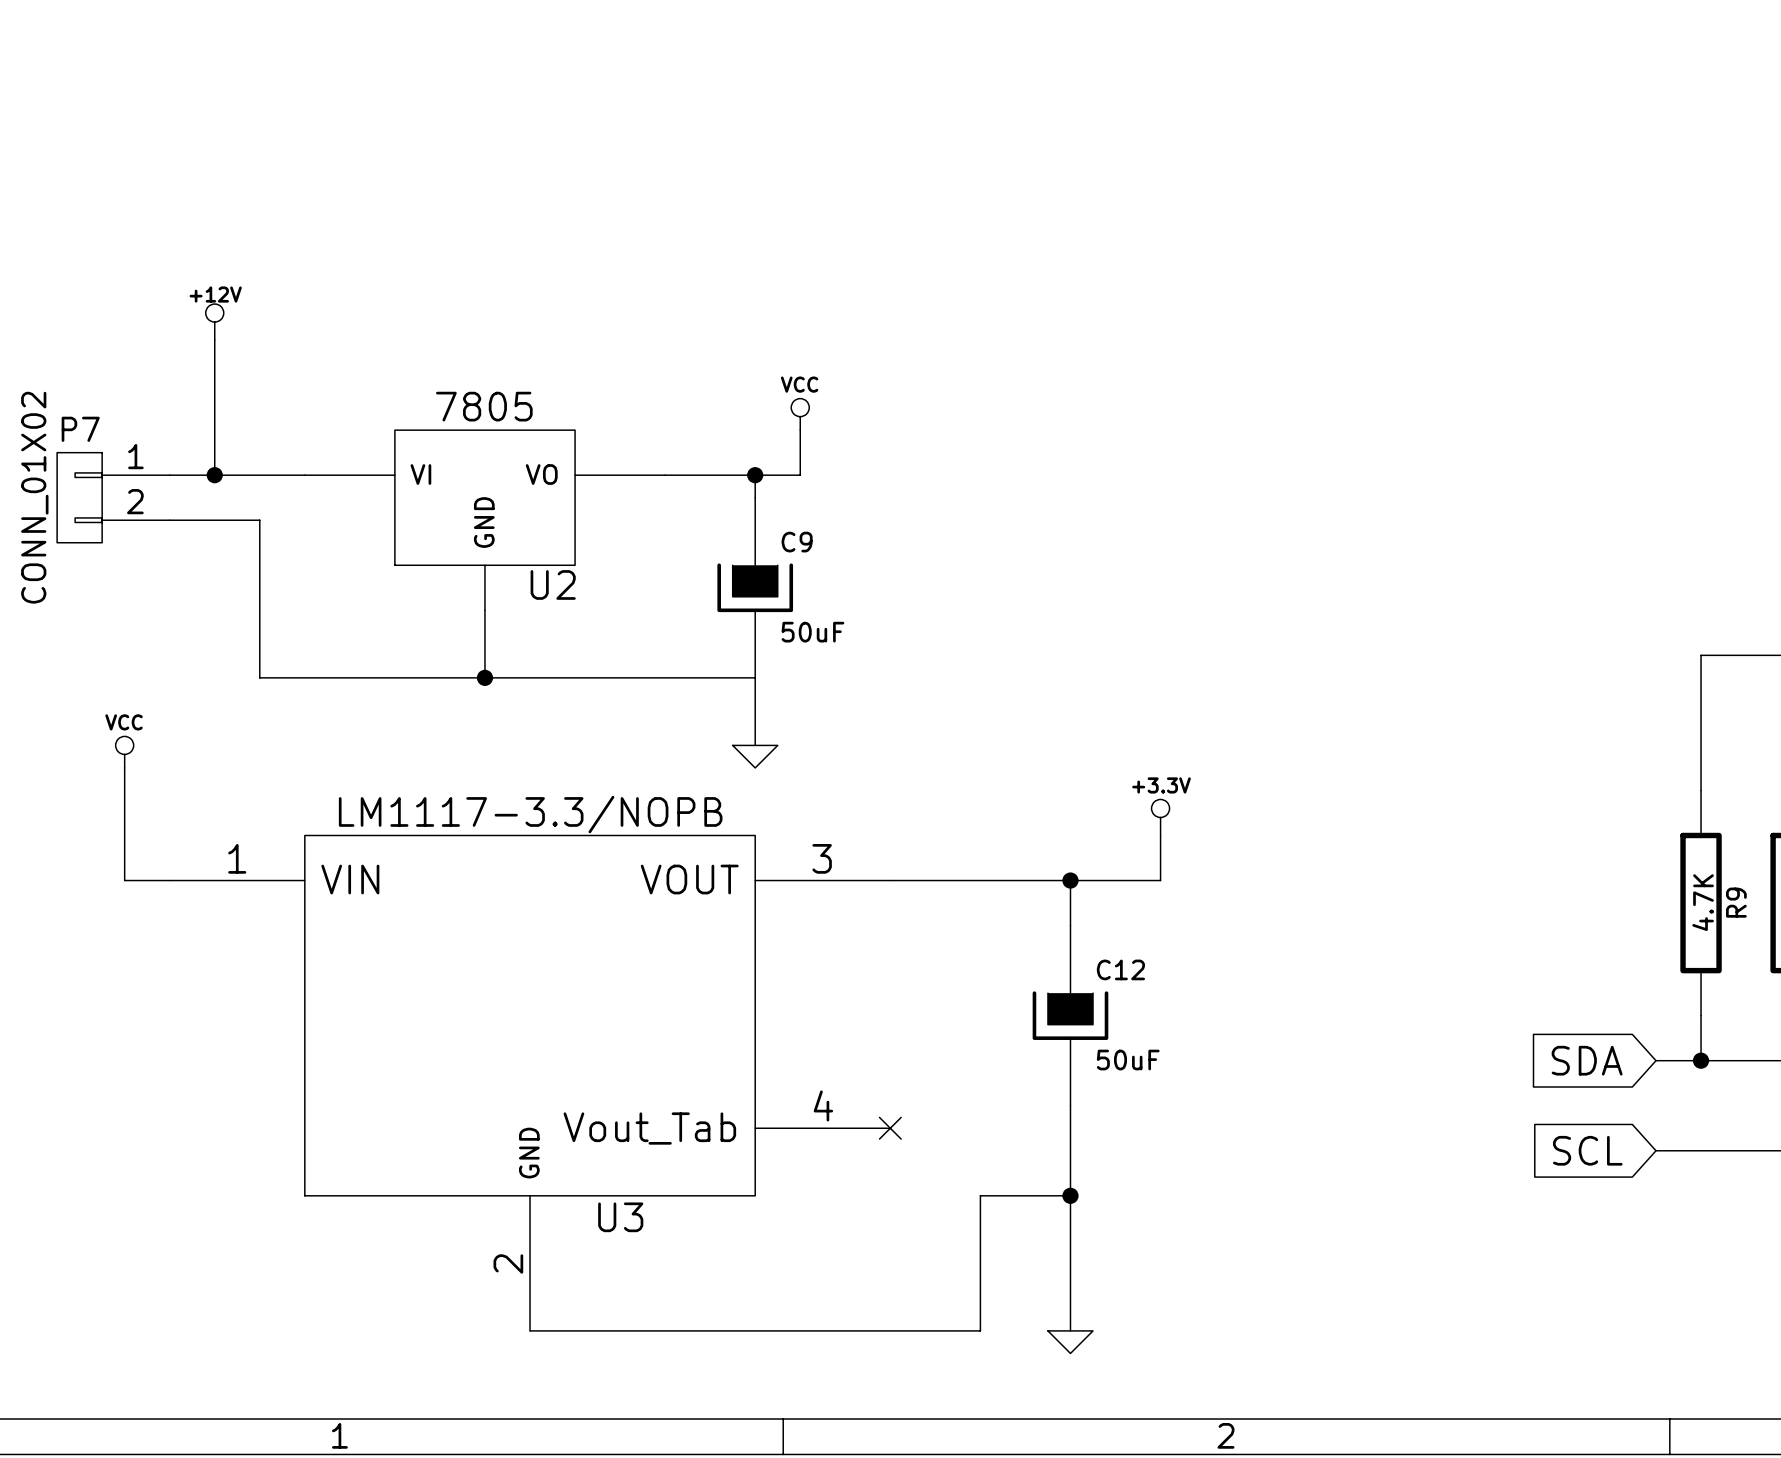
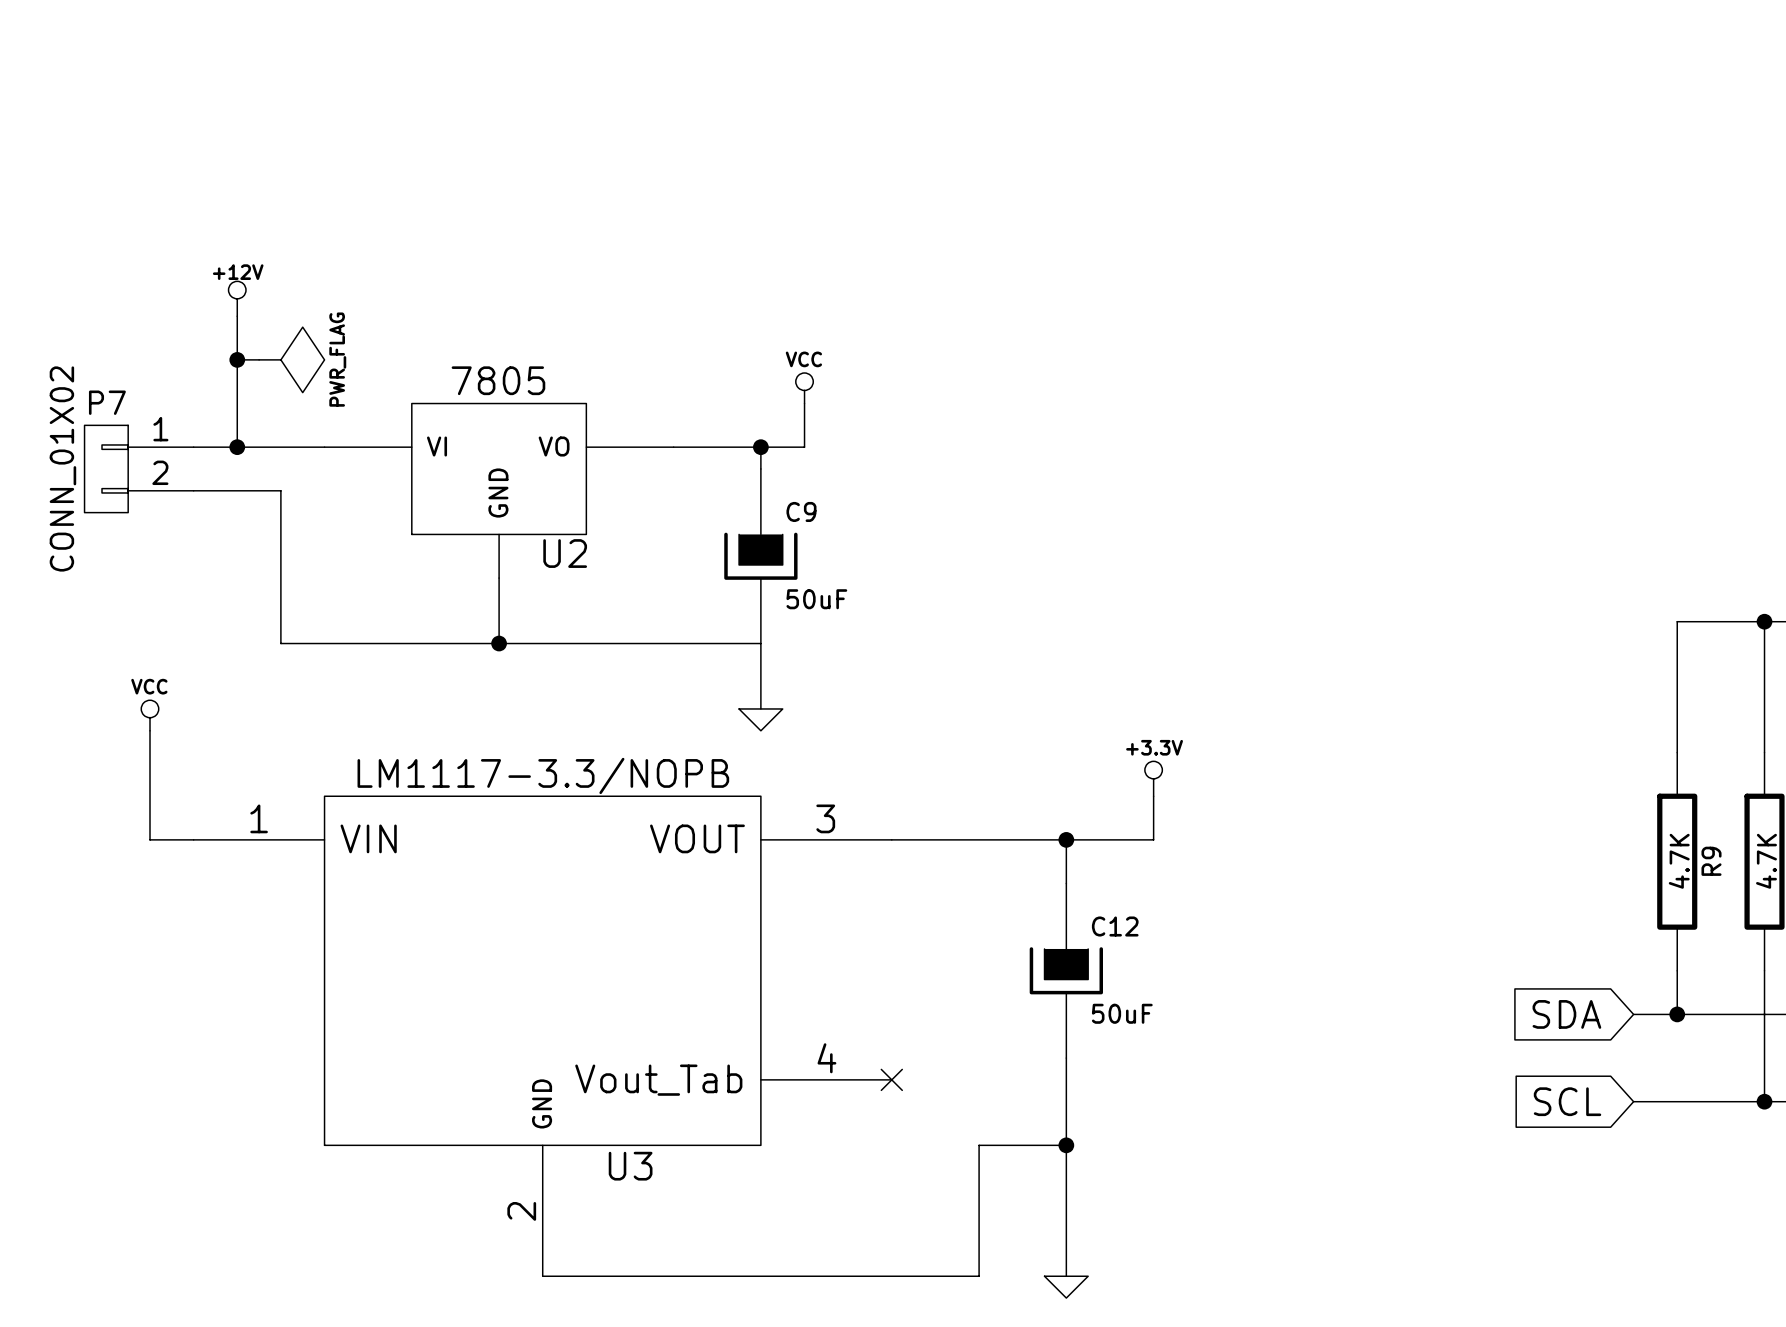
wire: none -> (237, 359) (259, 359)
junction: none -> (237, 359)
power symbol: none -> PWR_FLAG (291, 359)

